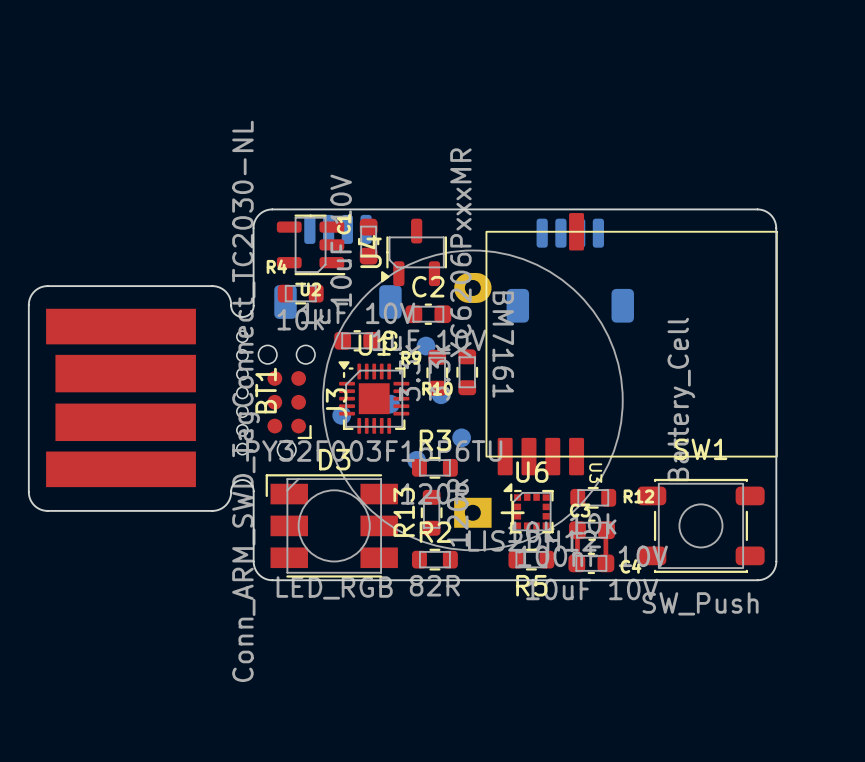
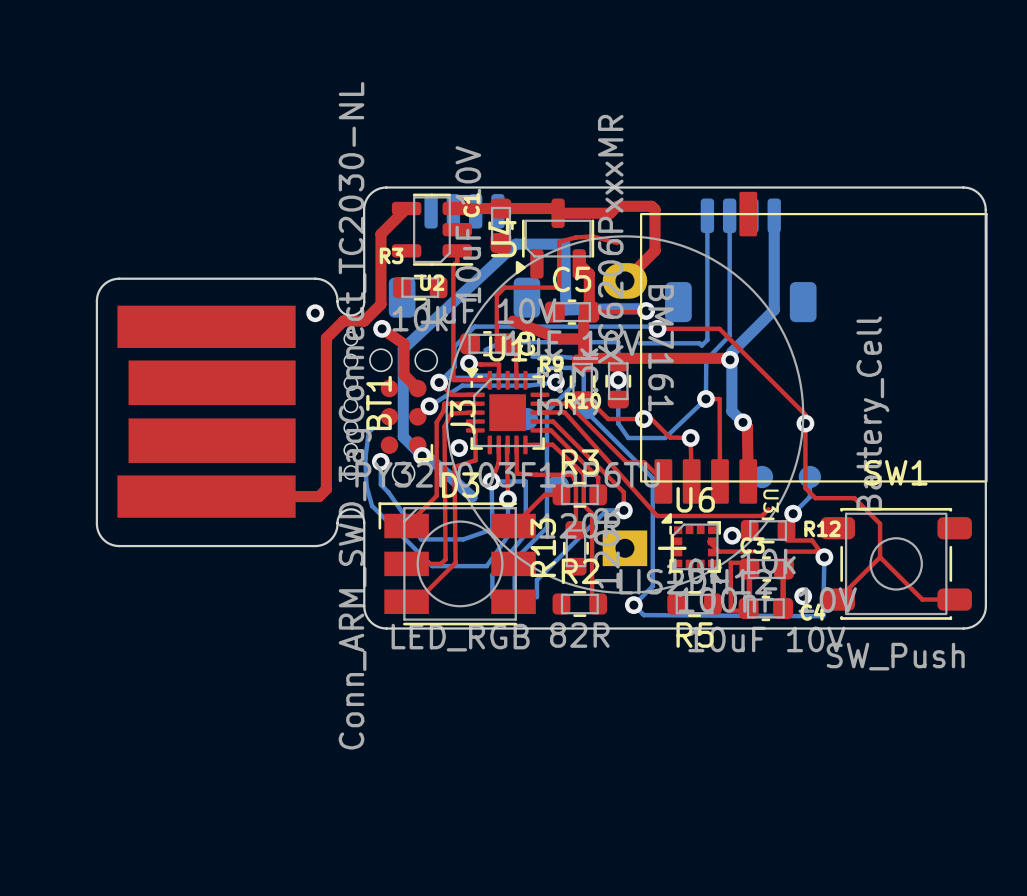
top track: none -> (406, 208) (380, 234) (380, 304) (364, 321) (343, 321) (326, 338) (326, 489) (319, 496) (206, 496)
top track: none -> (457, 208) (553, 208) (558, 213) (610, 213) (617, 206) (651, 206) (655, 209) (655, 250) (624, 280)
bottom track: none -> (707, 215) (707, 339) (701, 345) (699, 343) (639, 343)
bottom track: none -> (729, 215) (729, 335) (706, 360) (705, 399) (665, 438) (628, 438) (618, 423) (618, 342) (501, 342) (485, 350)
bottom track: none -> (774, 215) (774, 309) (731, 352) (731, 411) (743, 422)
top track: none -> (617, 243) (592, 236) (575, 237) (559, 241) (559, 287) (504, 287) (496, 295) (496, 341) (515, 341) (516, 380)
top track: none -> (457, 250) (457, 261) (453, 265) (453, 380) (489, 380)
R4 name: R4 (276, 266) -> R3 (391, 255)
top track: none -> (579, 263) (589, 273) (589, 312)
C2 name: C2 (428, 286) -> C5 (572, 279)
top track: none -> (646, 311) (589, 312)
bottom track: none -> (646, 311) (643, 308) (565, 309) (564, 244) (515, 244) (403, 348) (403, 436) (422, 455) (424, 453) (472, 497)
via: none -> (646, 311)
top track: none -> (589, 312) (583, 317) (584, 358) (728, 357) (730, 359)
via: none -> (315, 313)
top track: none -> (512, 321) (559, 338) (583, 338)
top track: none -> (382, 328) (404, 344) (404, 374) (417, 388)
via: none -> (382, 328)
top track: none -> (657, 328) (719, 328) (805, 414) (805, 488) (815, 498) (854, 498) (880, 523) (880, 557)
bottom track: none -> (657, 328) (655, 326) (474, 326) (454, 346) (454, 367) (439, 382)
via: none -> (657, 328)
part: (426, 346) -> none
bottom track: none -> (532, 356) (559, 356) (583, 360) (583, 409) (652, 478) (652, 586) (633, 605) (643, 615) (823, 616) (824, 557)
via: none -> (730, 359)
top track: none -> (468, 363) (499, 364) (498, 380)
via: none -> (468, 363)
bottom track: none -> (443, 377) (536, 375) (544, 367) (571, 367) (573, 370) (573, 384) (546, 411) (546, 527) (514, 559) (514, 597)
via: none -> (618, 380)
top track: none -> (439, 382) (451, 394) (475, 394)
via: none -> (439, 382)
bottom track: none -> (555, 382) (528, 385) (462, 385) (429, 406)
via: none -> (555, 382)
top track: none -> (583, 394) (608, 419) (651, 419) (670, 437) (690, 438) (691, 491)
top track: none -> (705, 399) (719, 399) (719, 481)
via: none -> (705, 399)
top track: none -> (475, 403) (444, 403) (443, 411) (436, 422) (436, 495) (406, 526)
top track: none -> (539, 403) (567, 403) (626, 462) (644, 462) (663, 481)
via: none -> (429, 406)
top track: none -> (475, 412) (451, 413) (444, 426) (445, 559) (441, 563) (406, 563)
top track: none -> (539, 412) (564, 412) (657, 515) (761, 515) (768, 509)
via: none -> (643, 419)
top track: none -> (539, 421) (553, 421) (623, 492) (623, 510)
top track: none -> (743, 422) (747, 426) (748, 481)
via: none -> (743, 422)
via: none -> (805, 423)
bottom track: none -> (373, 427) (368, 432) (365, 458) (366, 485) (372, 505) (432, 566) (486, 566) (507, 536) (507, 499)
top track: none -> (475, 430) (475, 460) (454, 466) (455, 562) (416, 601) (406, 601)
top track: none -> (539, 430) (550, 430) (598, 477) (598, 494)
part: (341, 415) -> none
via: none -> (690, 438)
top track: none -> (498, 444) (498, 462) (491, 481)
top track: none -> (507, 444) (507, 499)
top track: none -> (516, 444) (516, 473) (572, 474) (575, 484) (575, 529)
top track: none -> (525, 444) (552, 444) (583, 474) (583, 505) (592, 513) (592, 597) (598, 603)
via: none -> (459, 448)
via: none -> (422, 455)
part: (461, 437) -> none
bottom track: none -> (380, 461) (380, 484) (388, 492) (421, 539) (463, 539) (492, 529) (491, 481) (525, 481) (525, 533) (492, 575) (492, 597)
via: none -> (380, 461)
part: none -> (761, 477)
bottom track: none -> (809, 477) (809, 497) (793, 513)
part: none -> (809, 477)
via: none -> (491, 481)
top track: none -> (561, 494) (544, 494) (513, 526)
via: none -> (507, 499)
bottom track: none -> (623, 510) (606, 510) (536, 580) (536, 597)
via: none -> (623, 510)
via: none -> (793, 513)
via: none -> (732, 535)
top track: none -> (786, 540) (812, 540) (824, 557) (815, 551) (786, 551)
top track: none -> (709, 541) (719, 551) (752, 551)
via: none -> (824, 557)
top track: none -> (880, 557) (922, 599) (954, 599)
top track: none -> (880, 557) (837, 599)
top track: none -> (752, 562) (730, 562) (730, 610) (746, 610)
via: none -> (803, 596)
via: none -> (633, 605)

